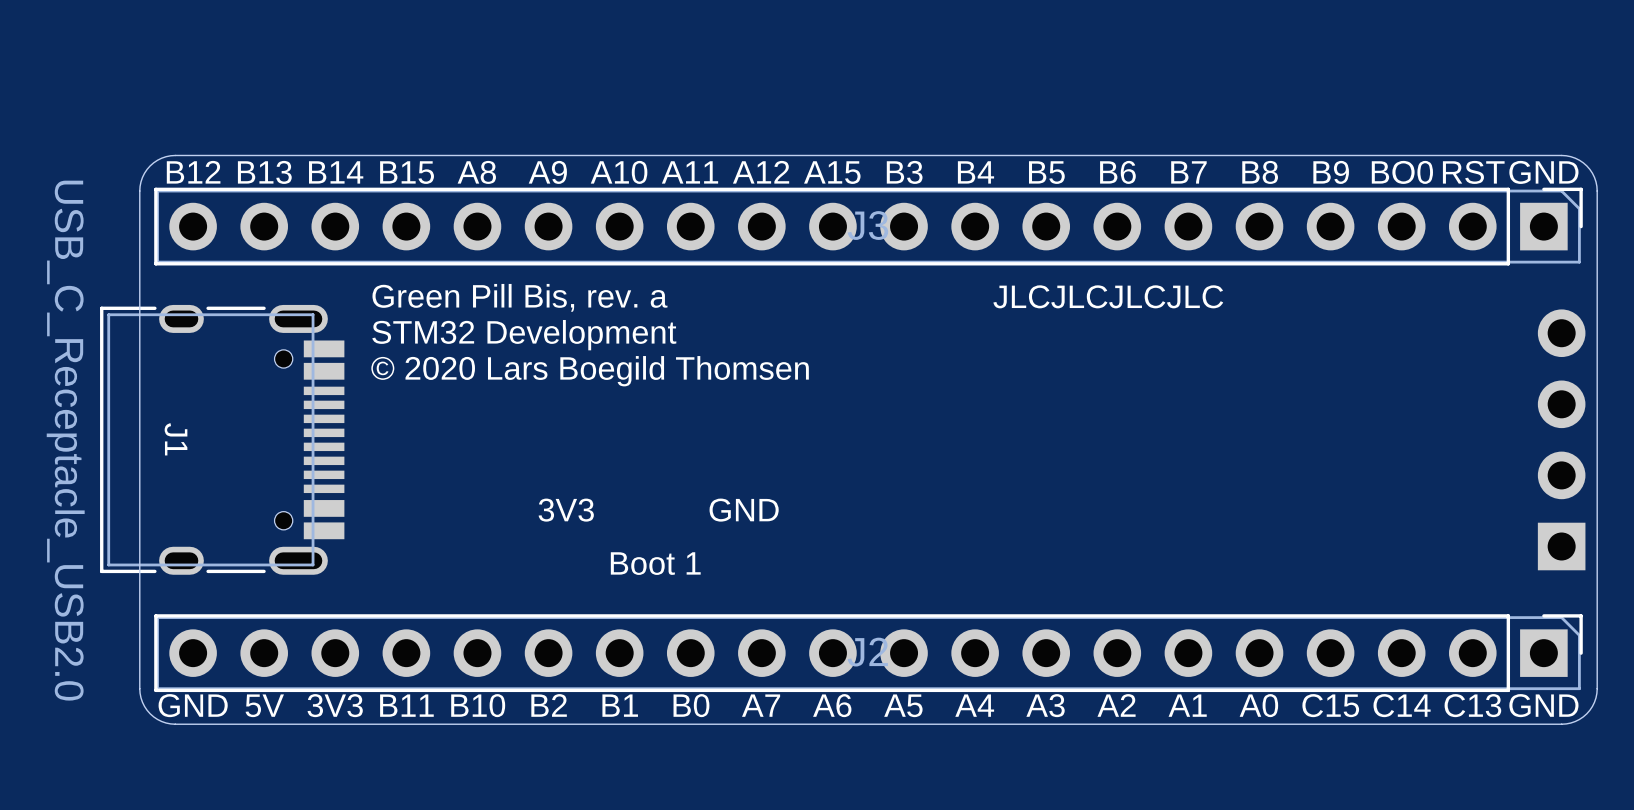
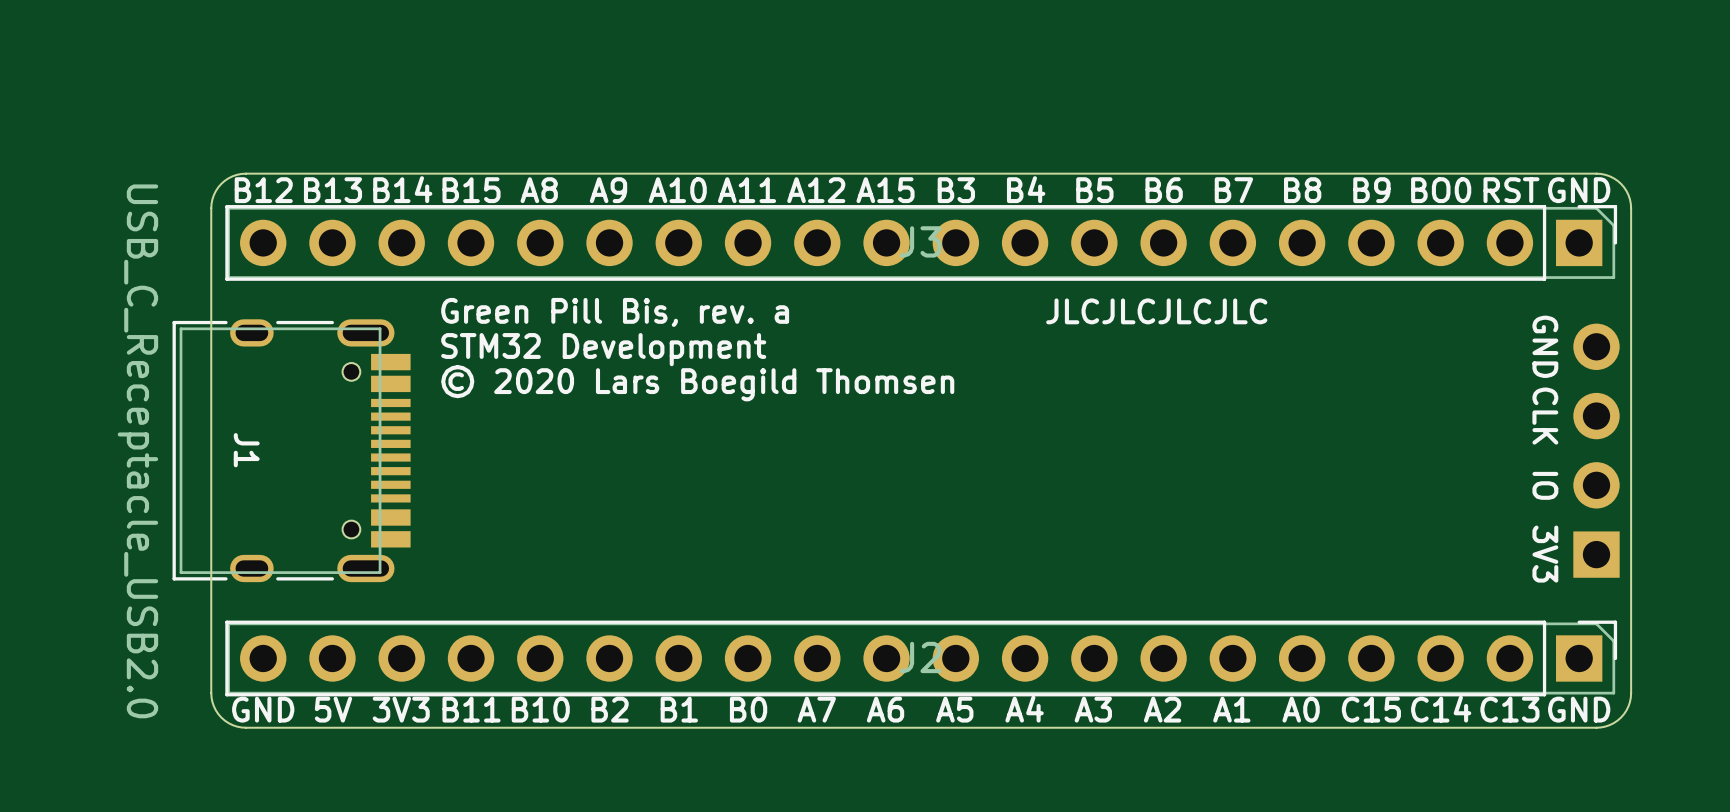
text: none -> GND (1545, 346)
text: none -> CLK (1545, 416)
text: none -> IO (1545, 485)
text: 3V3 (566, 510) -> none
text: GND (744, 510) -> none
text: none -> 3V3 (1545, 554)
text: Boot 1 (655, 563) -> none

